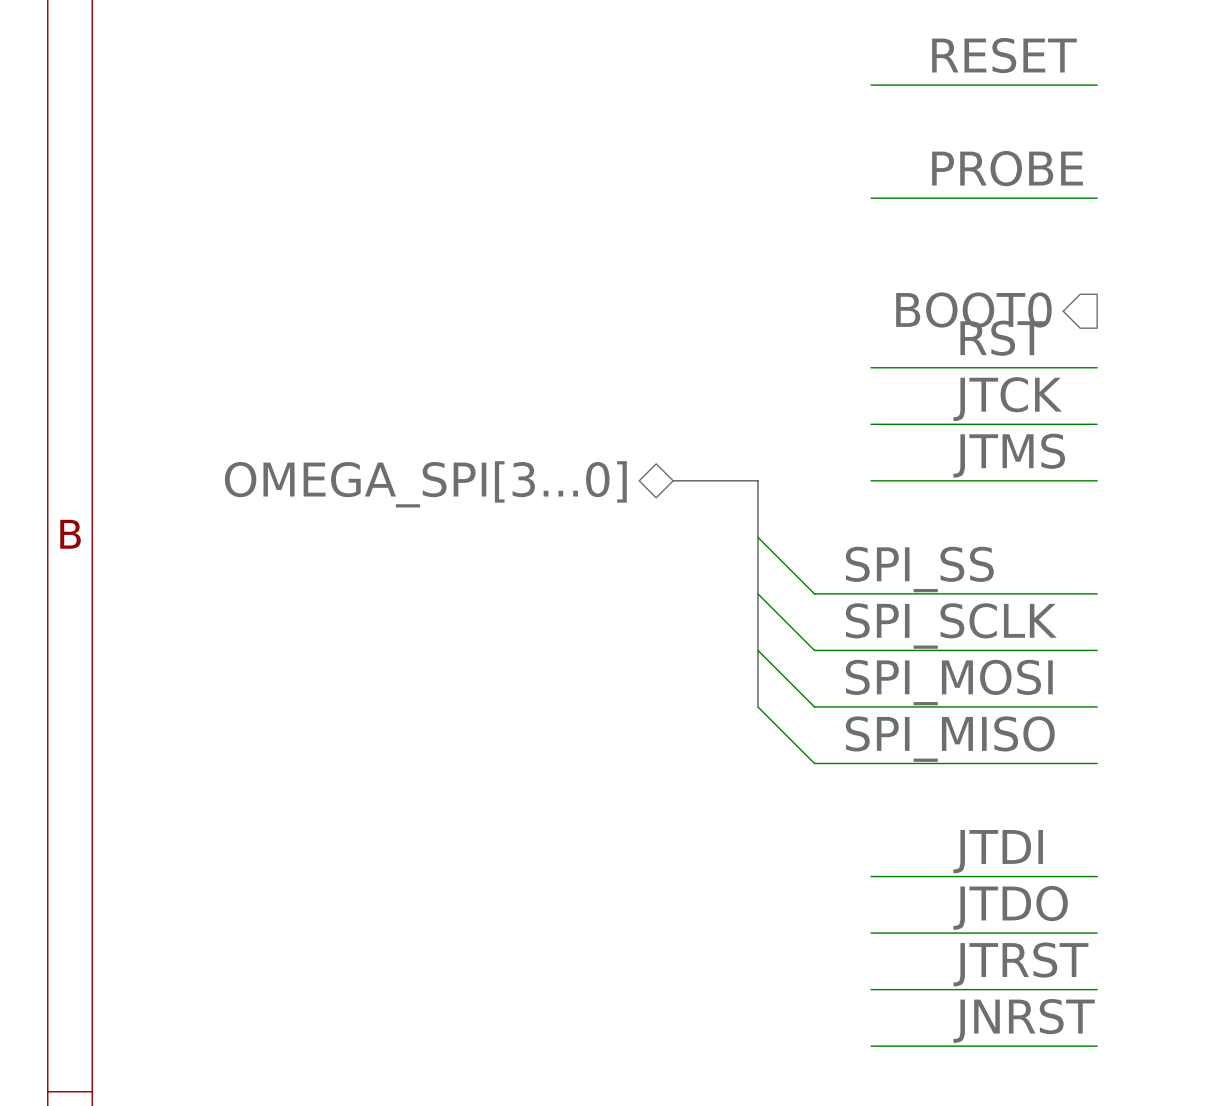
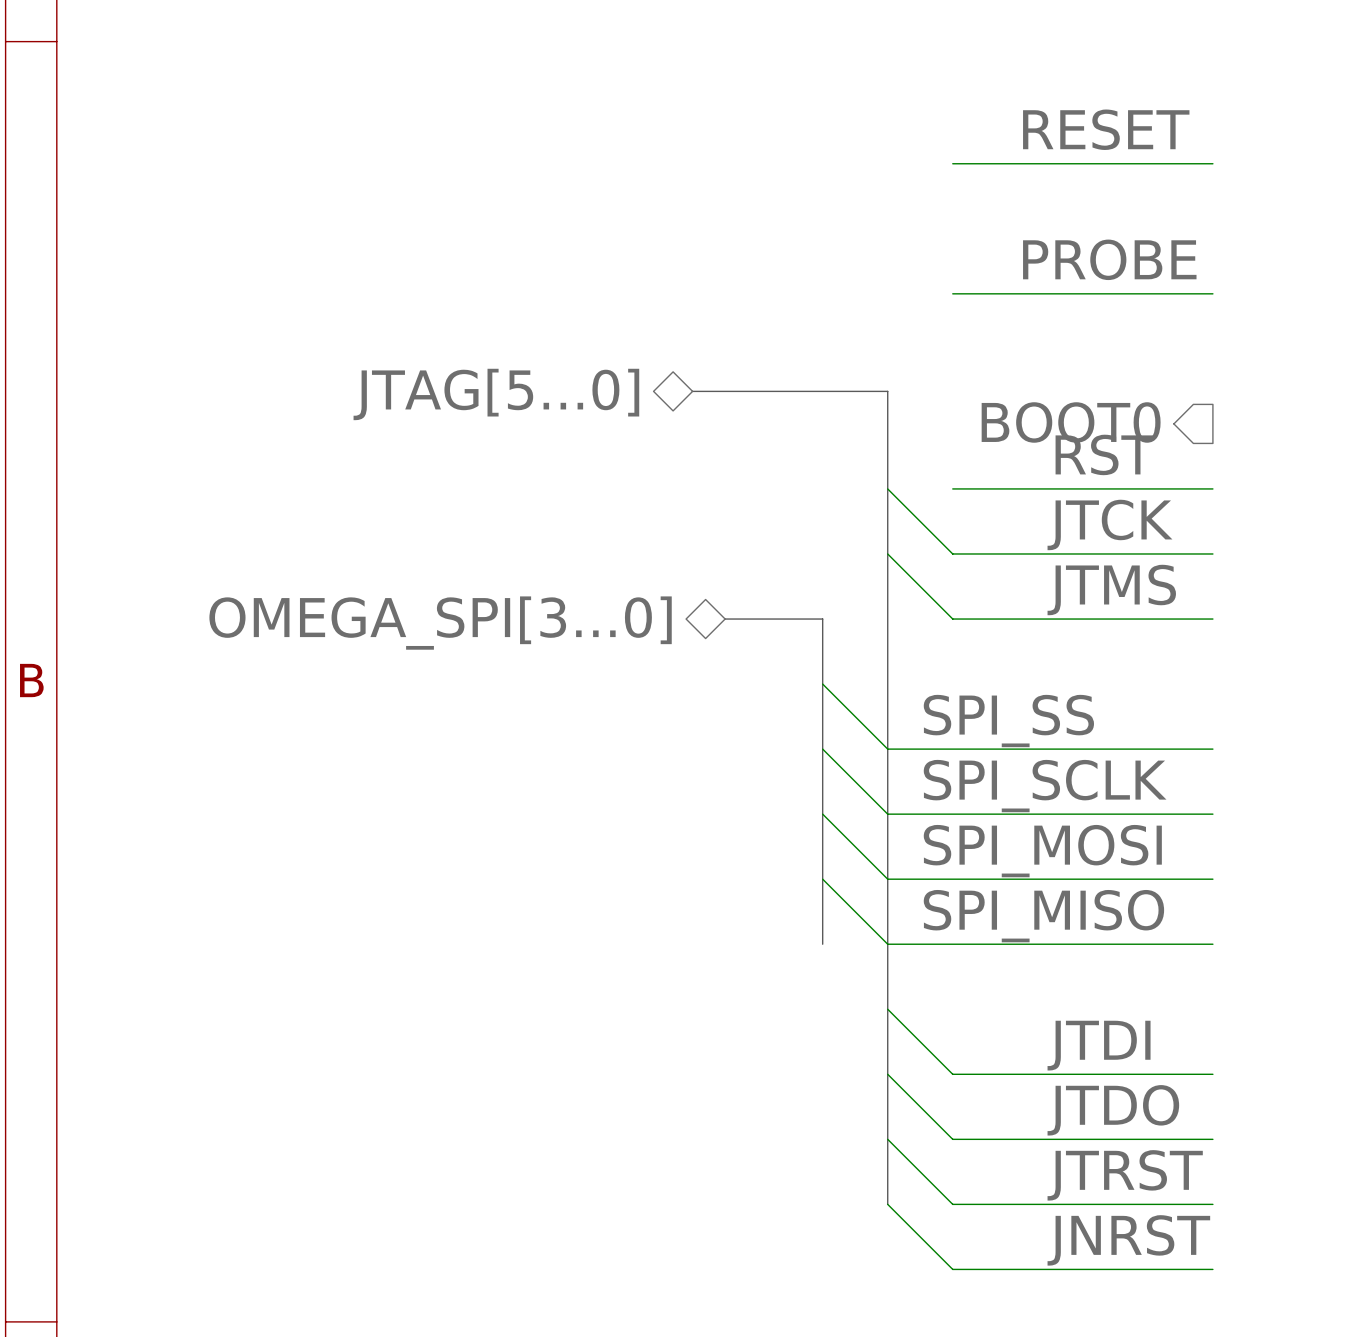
bus: none -> (692, 391) (887, 391) (887, 1204)
hierarchical label: none -> JTAG[5...0] (496, 394)
wire: none -> (887, 488) (952, 553)
wire: none -> (887, 553) (952, 619)
bus: none -> (822, 879) (822, 944)
wire: none -> (887, 1009) (952, 1074)
wire: none -> (887, 1074) (952, 1139)
wire: none -> (887, 1139) (952, 1204)
wire: none -> (887, 1204) (952, 1269)

